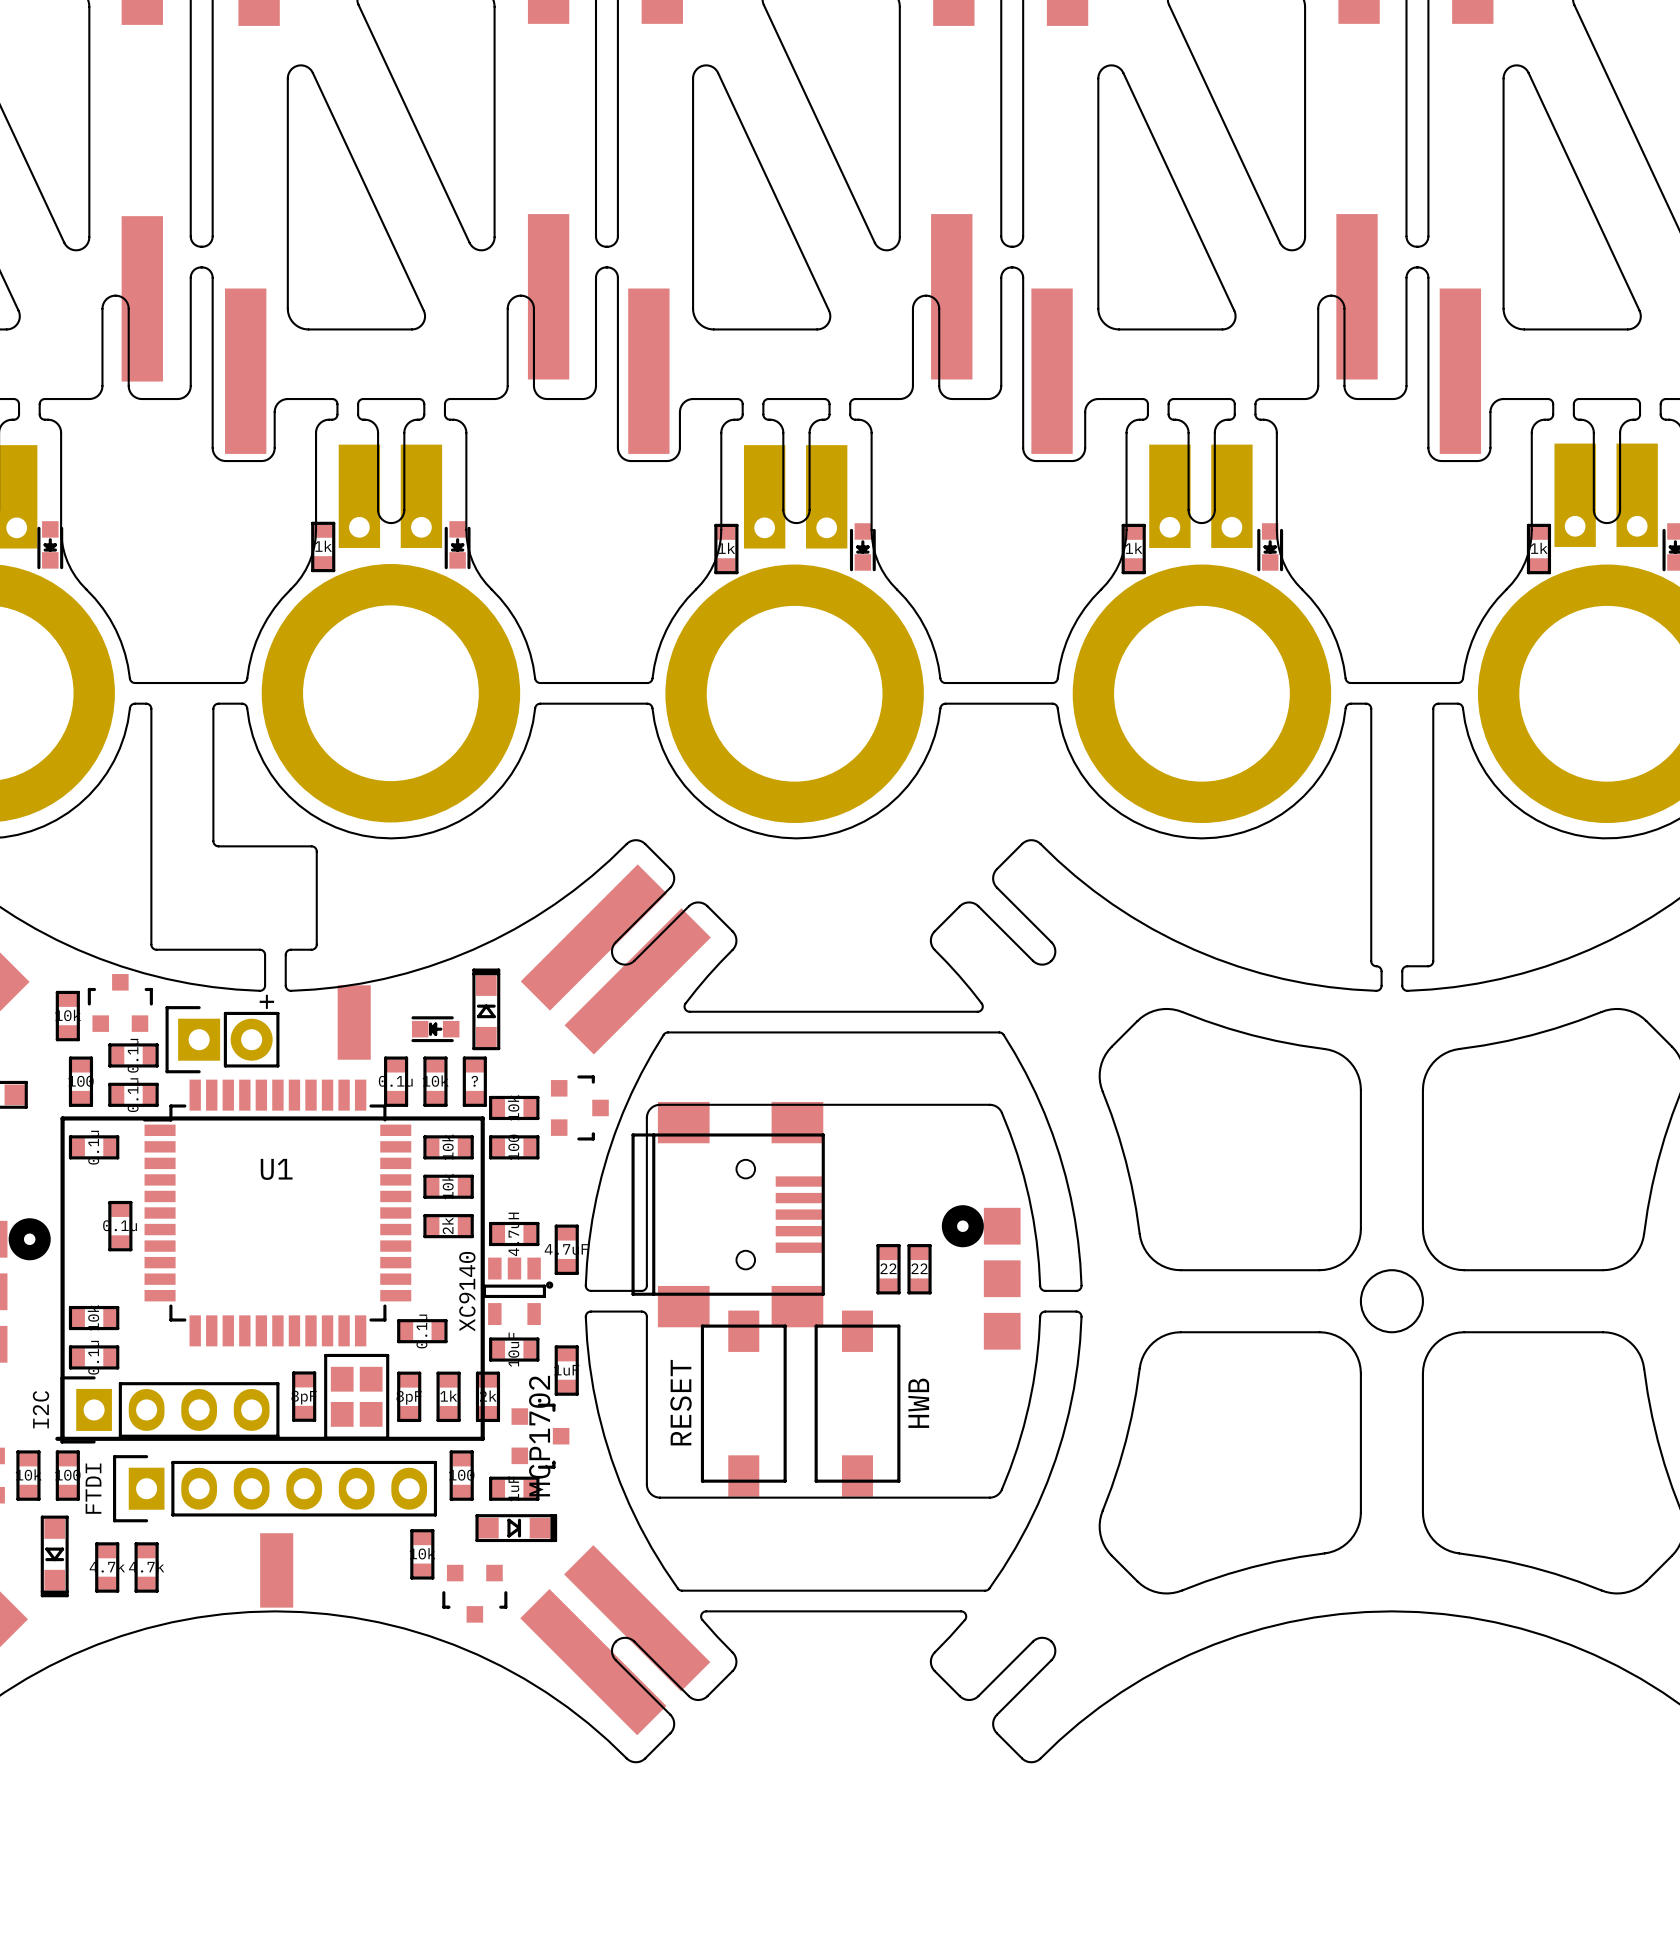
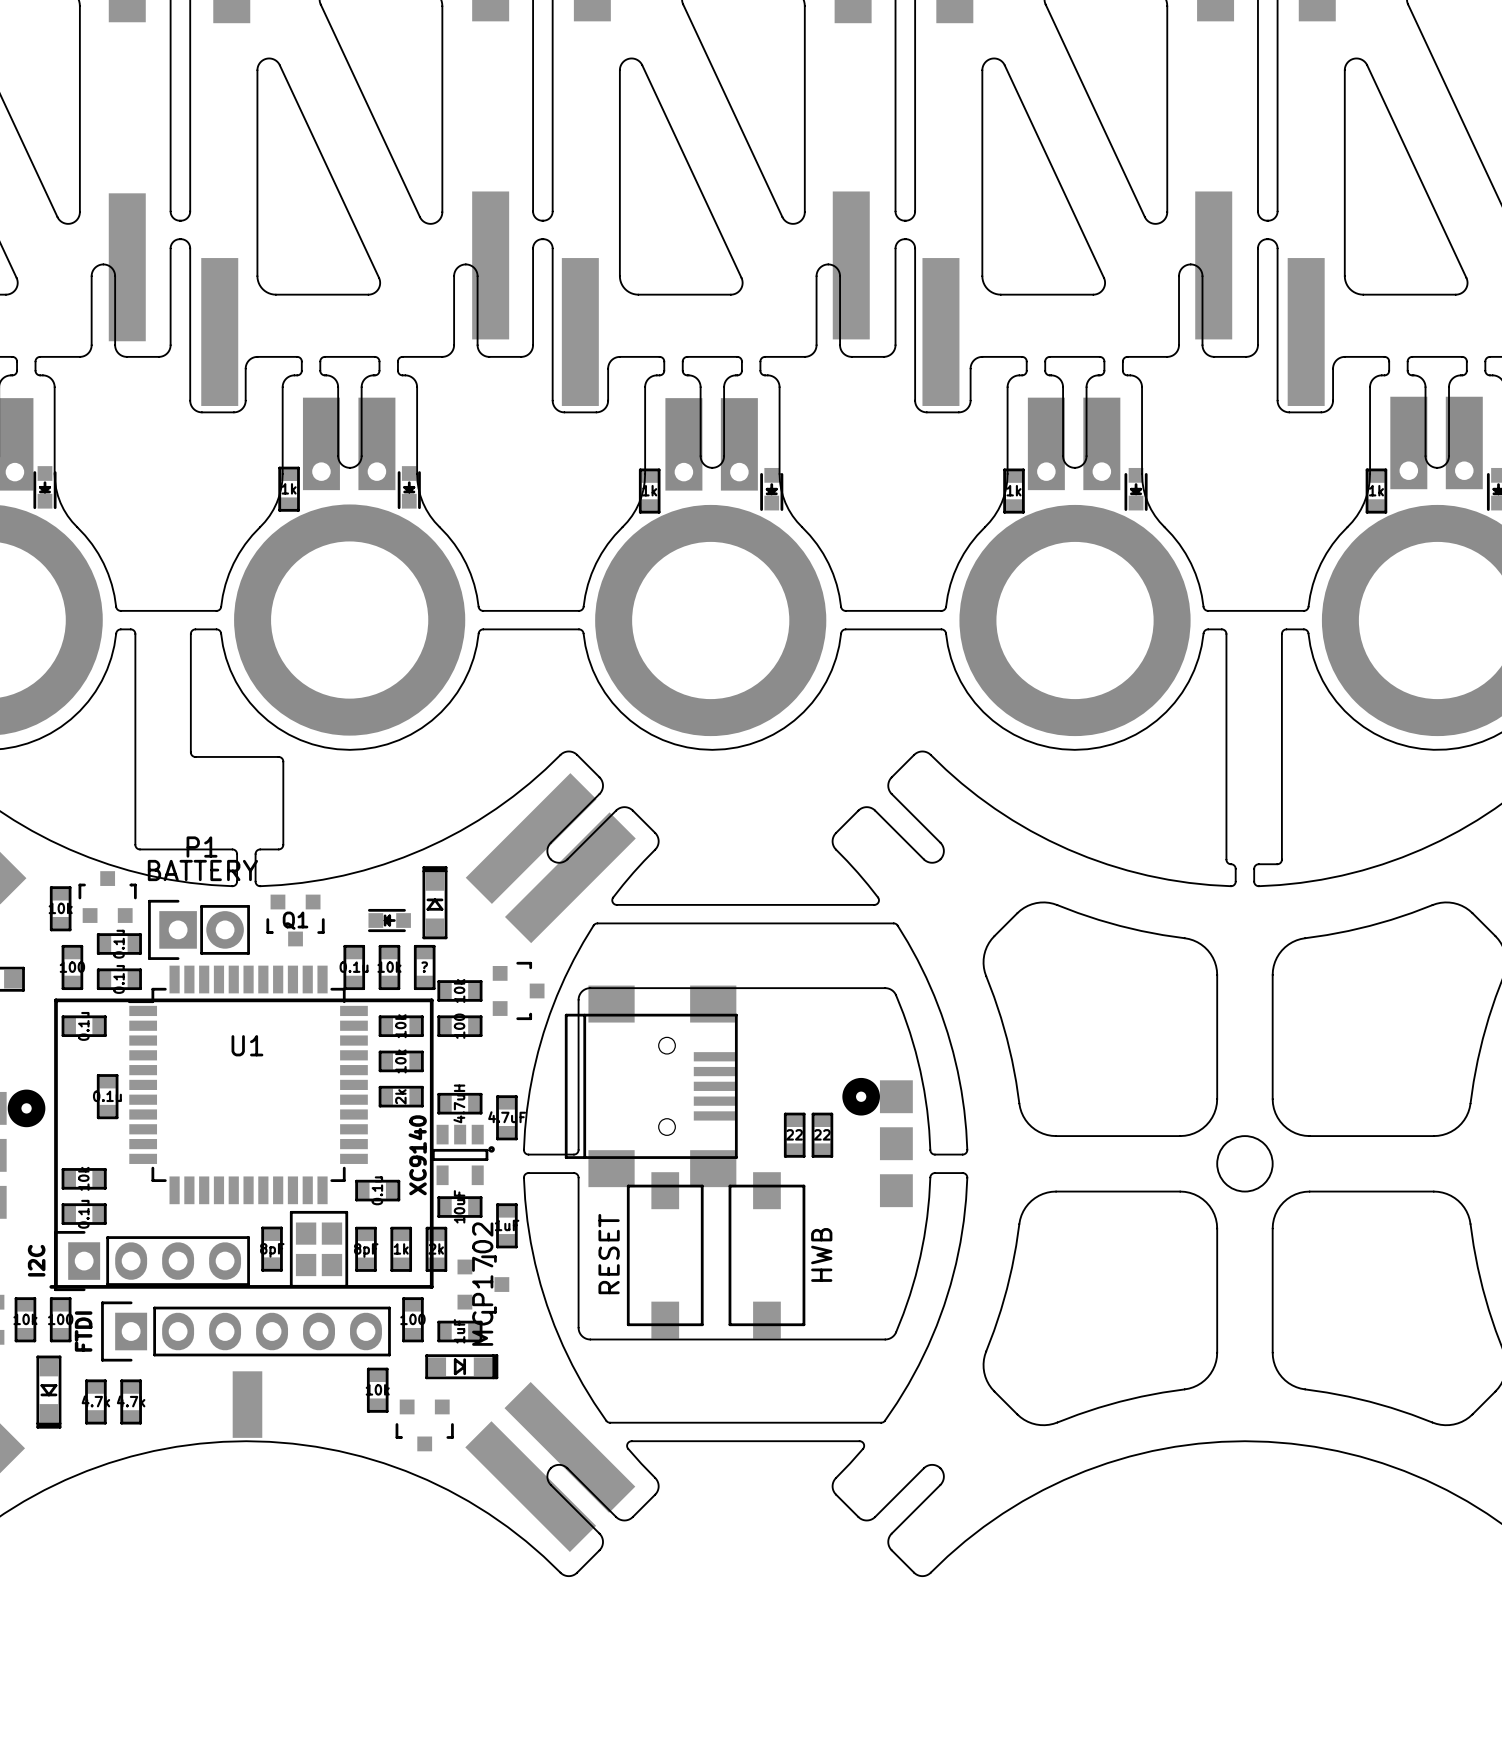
P1 name: none -> P1 (202, 847)
P1 value: none -> BATTERY (202, 870)
P1 text: + (266, 1001) -> none
part: (354, 1022) -> none
Q1: none -> (295, 920)

